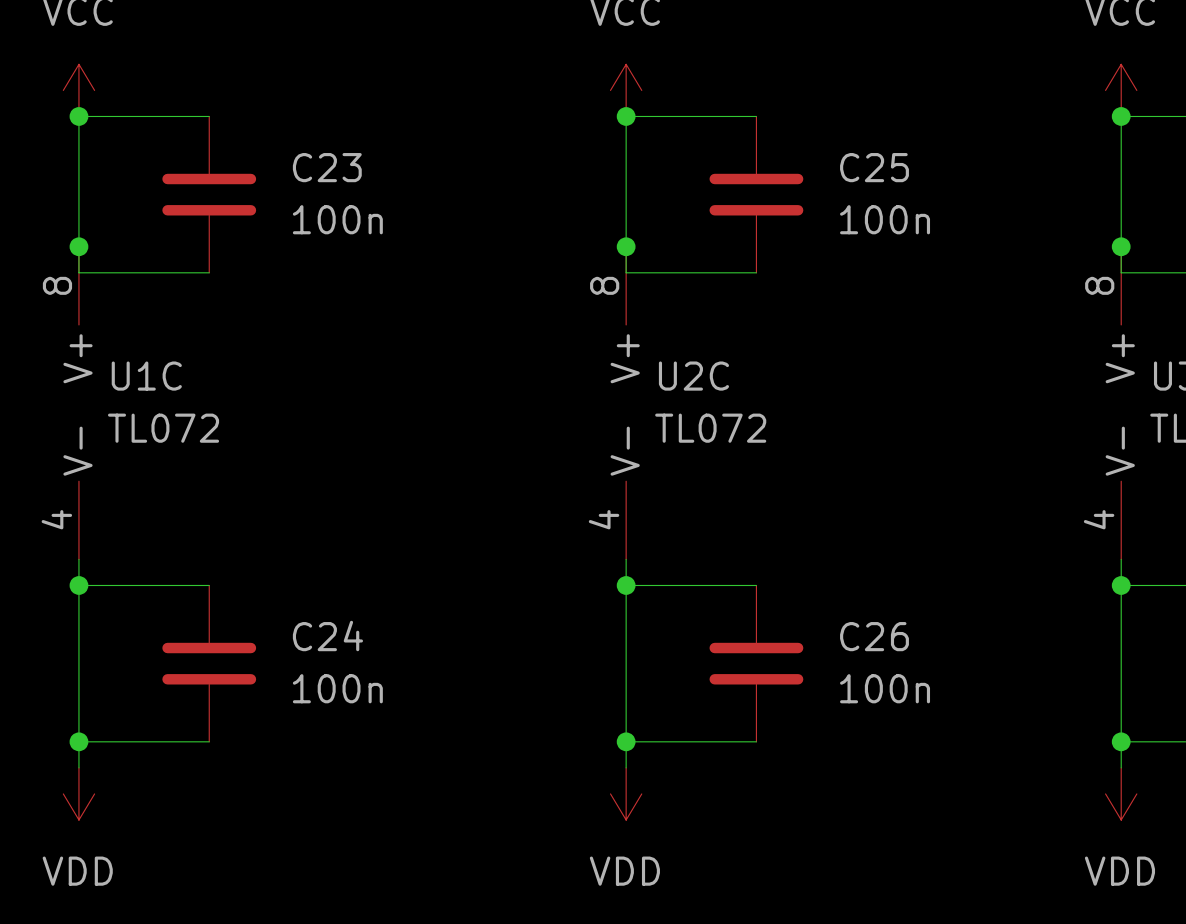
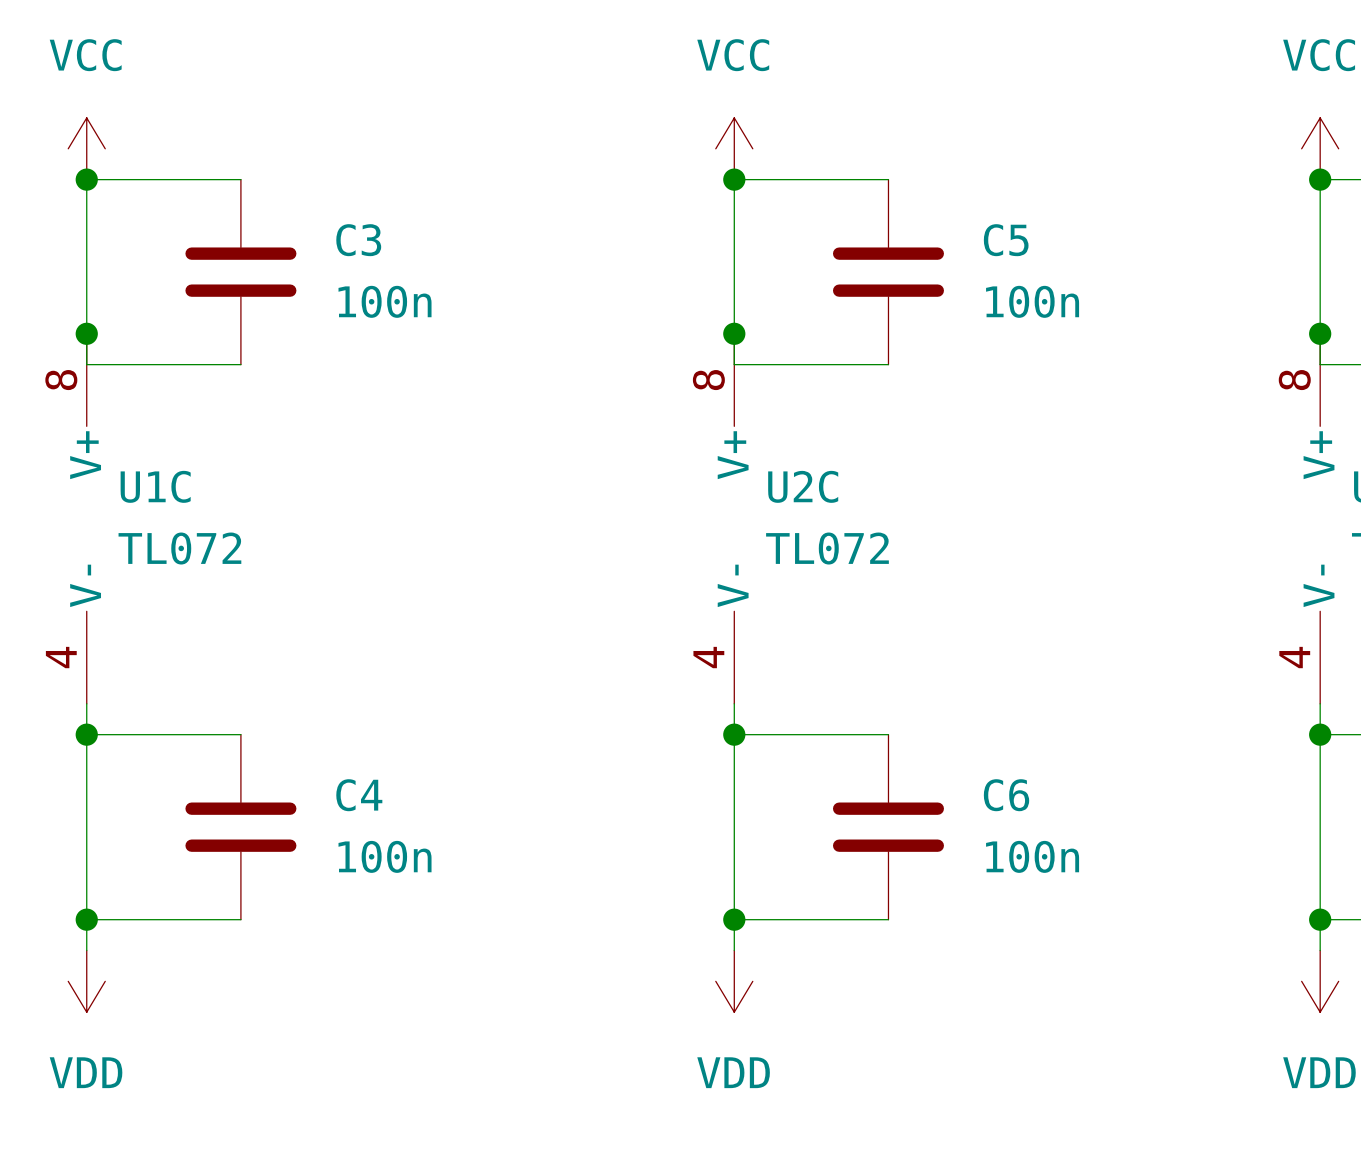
C23 name: C23 (327, 167) -> C3 (358, 240)
C25 name: C25 (874, 167) -> C5 (1006, 240)
C24 name: C24 (327, 636) -> C4 (359, 795)
C26 name: C26 (874, 636) -> C6 (1006, 795)

